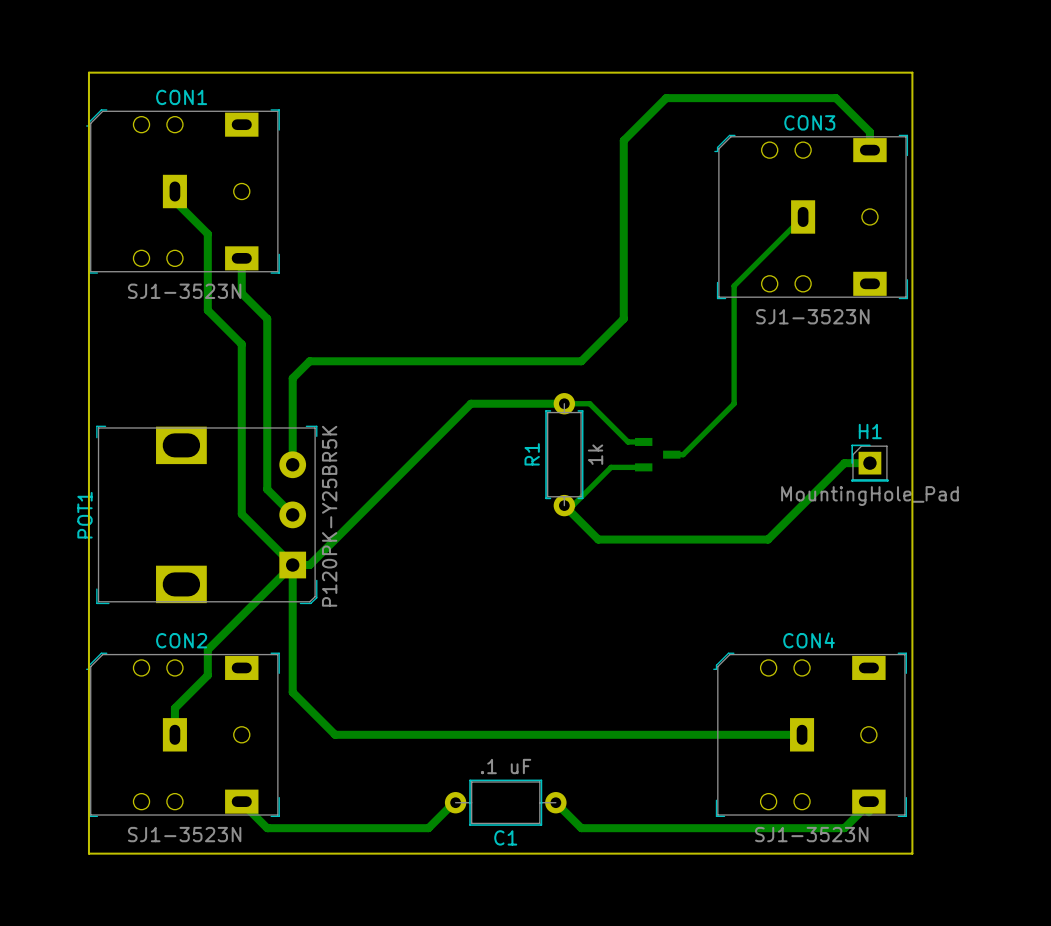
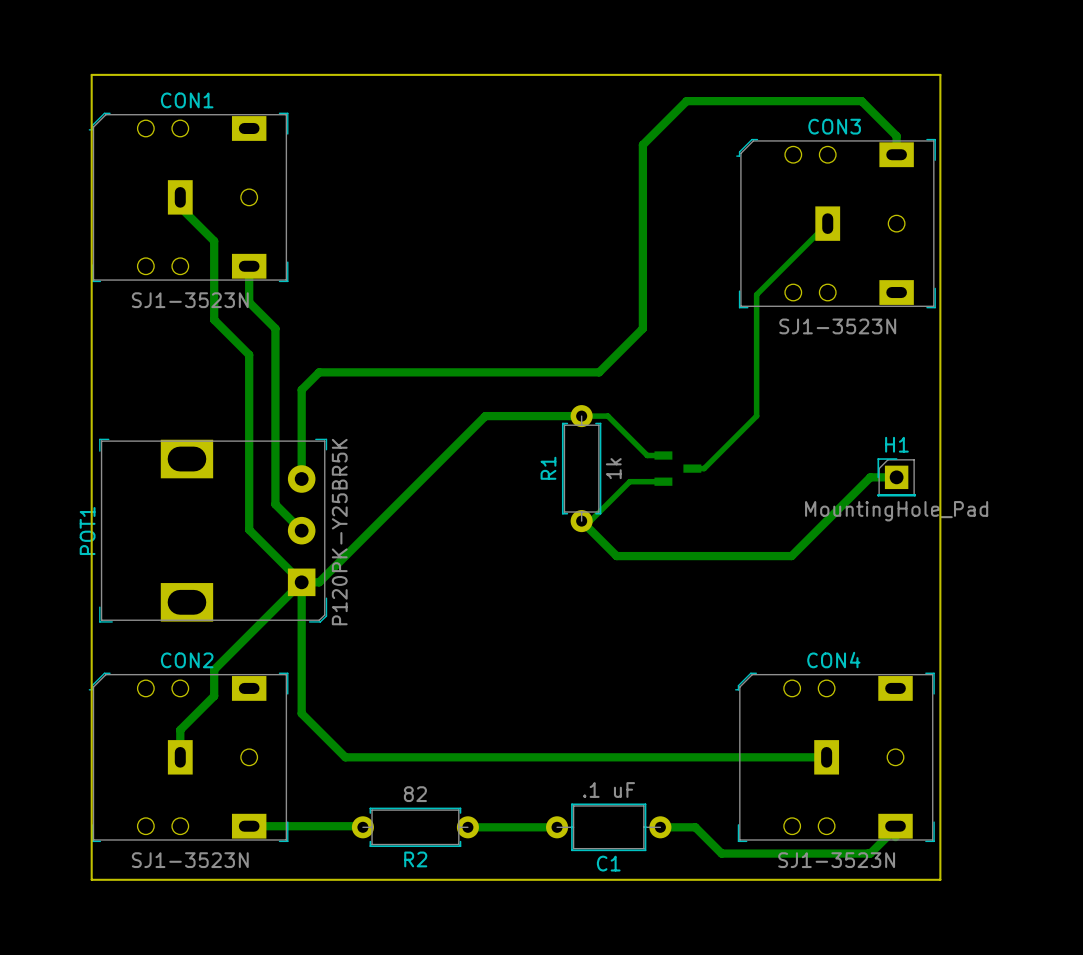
bottom track: none -> (249, 826) (362, 827)
bottom track: (241, 802) (267, 828) (428, 828) (453, 802) -> none
R2: none -> 82 (415, 827)
bottom track: none -> (469, 827) (557, 827)
C1 position: (505, 802) -> (608, 827)
bottom track: (555, 802) (581, 828) (700, 828) -> (660, 827) (695, 827) (721, 853)

